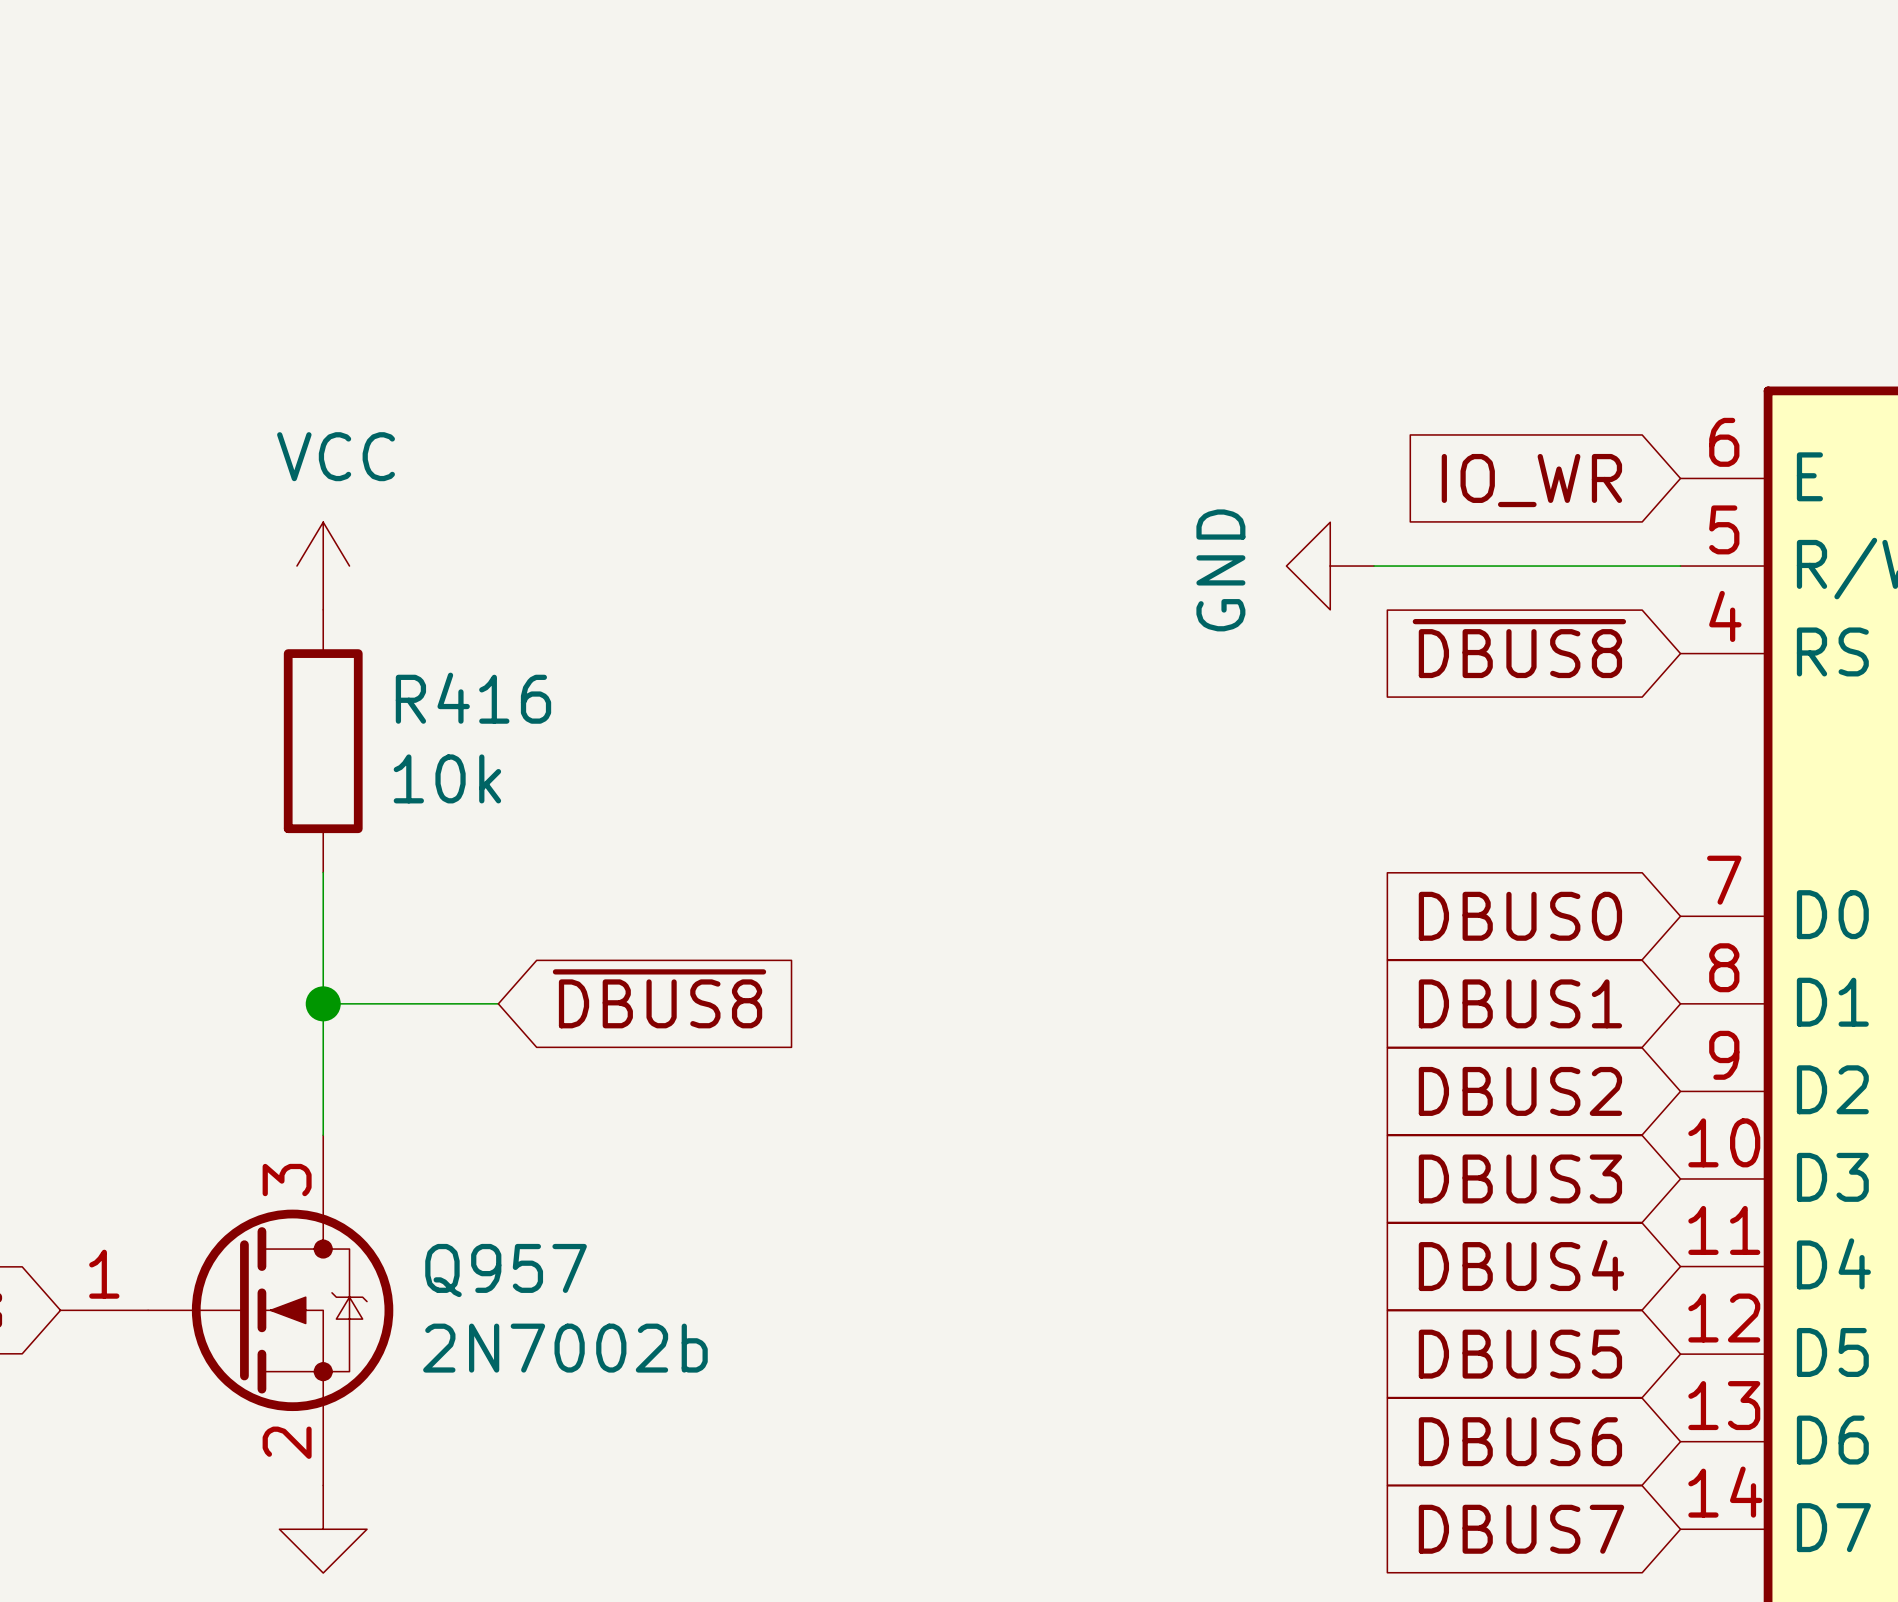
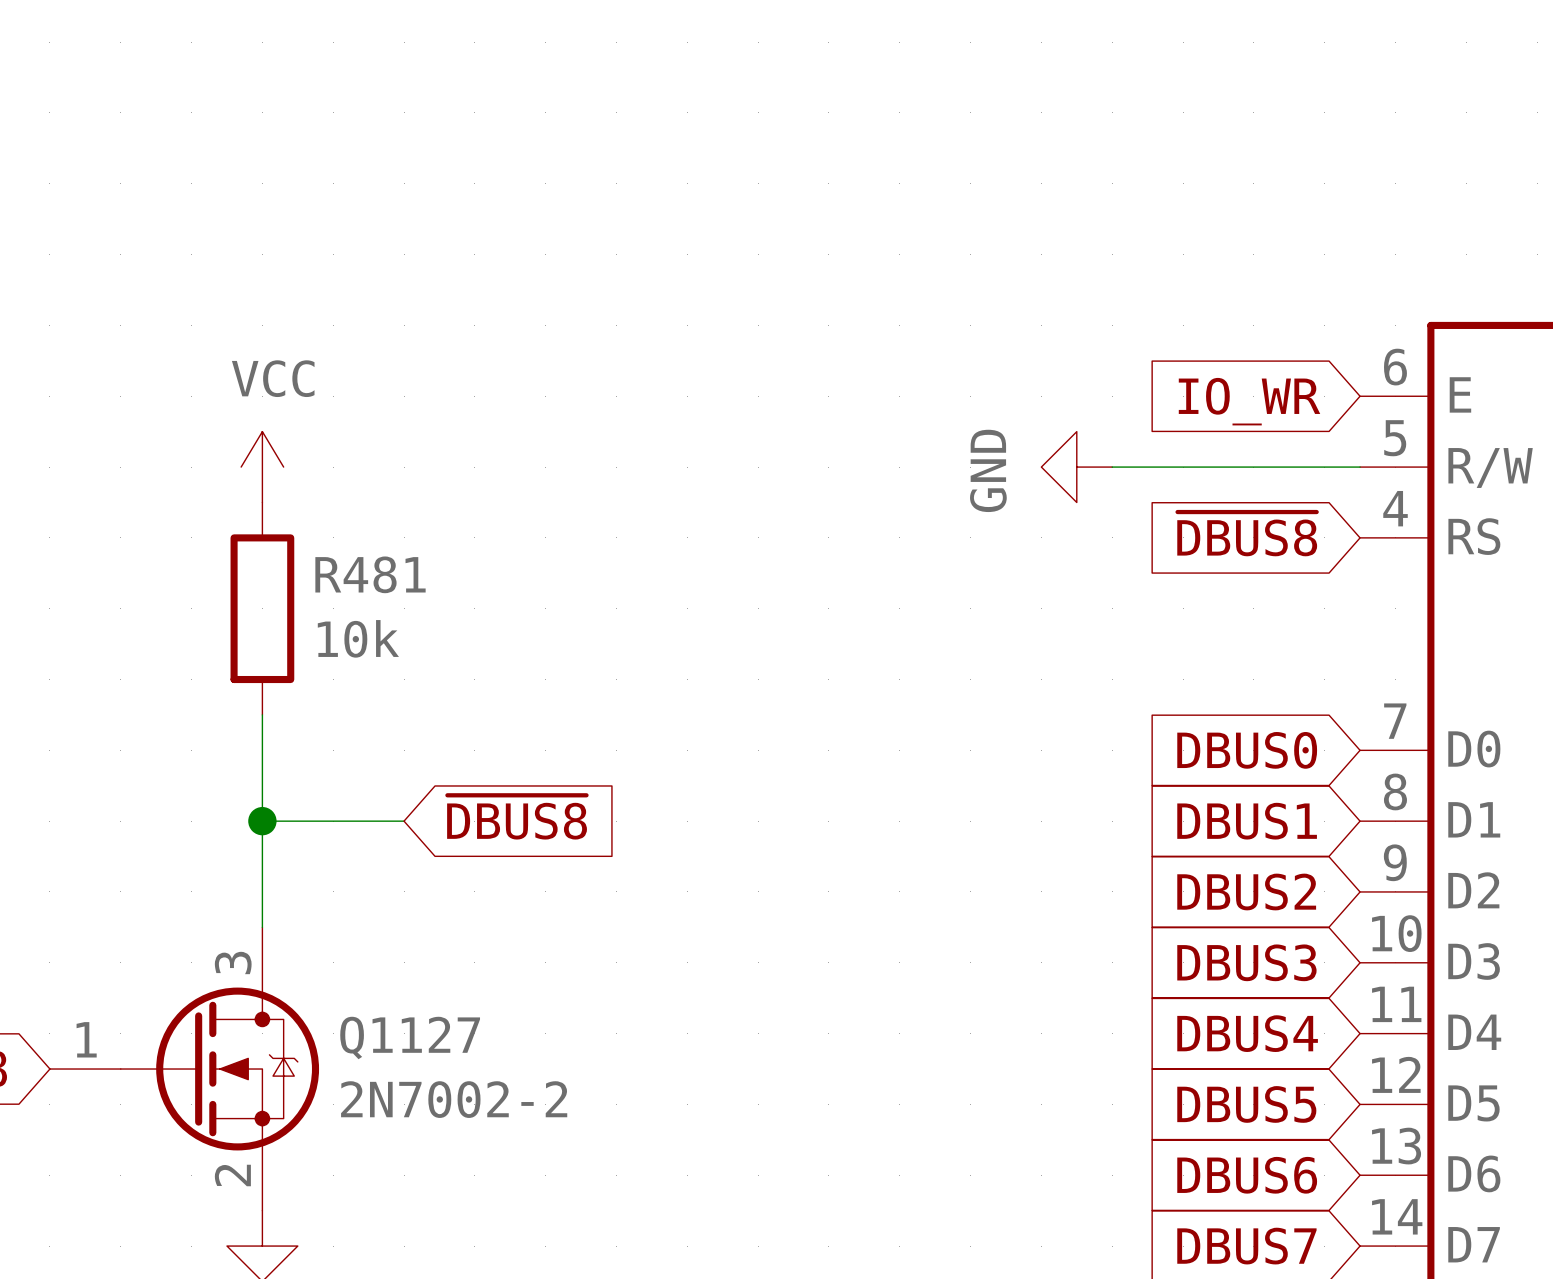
R416 name: R416 (473, 698) -> R481 (370, 574)
Q957 name: Q957 (506, 1270) -> Q1127 (410, 1038)
Q957 value: 2N7002b (565, 1348) -> 2N7002-2 (454, 1099)

